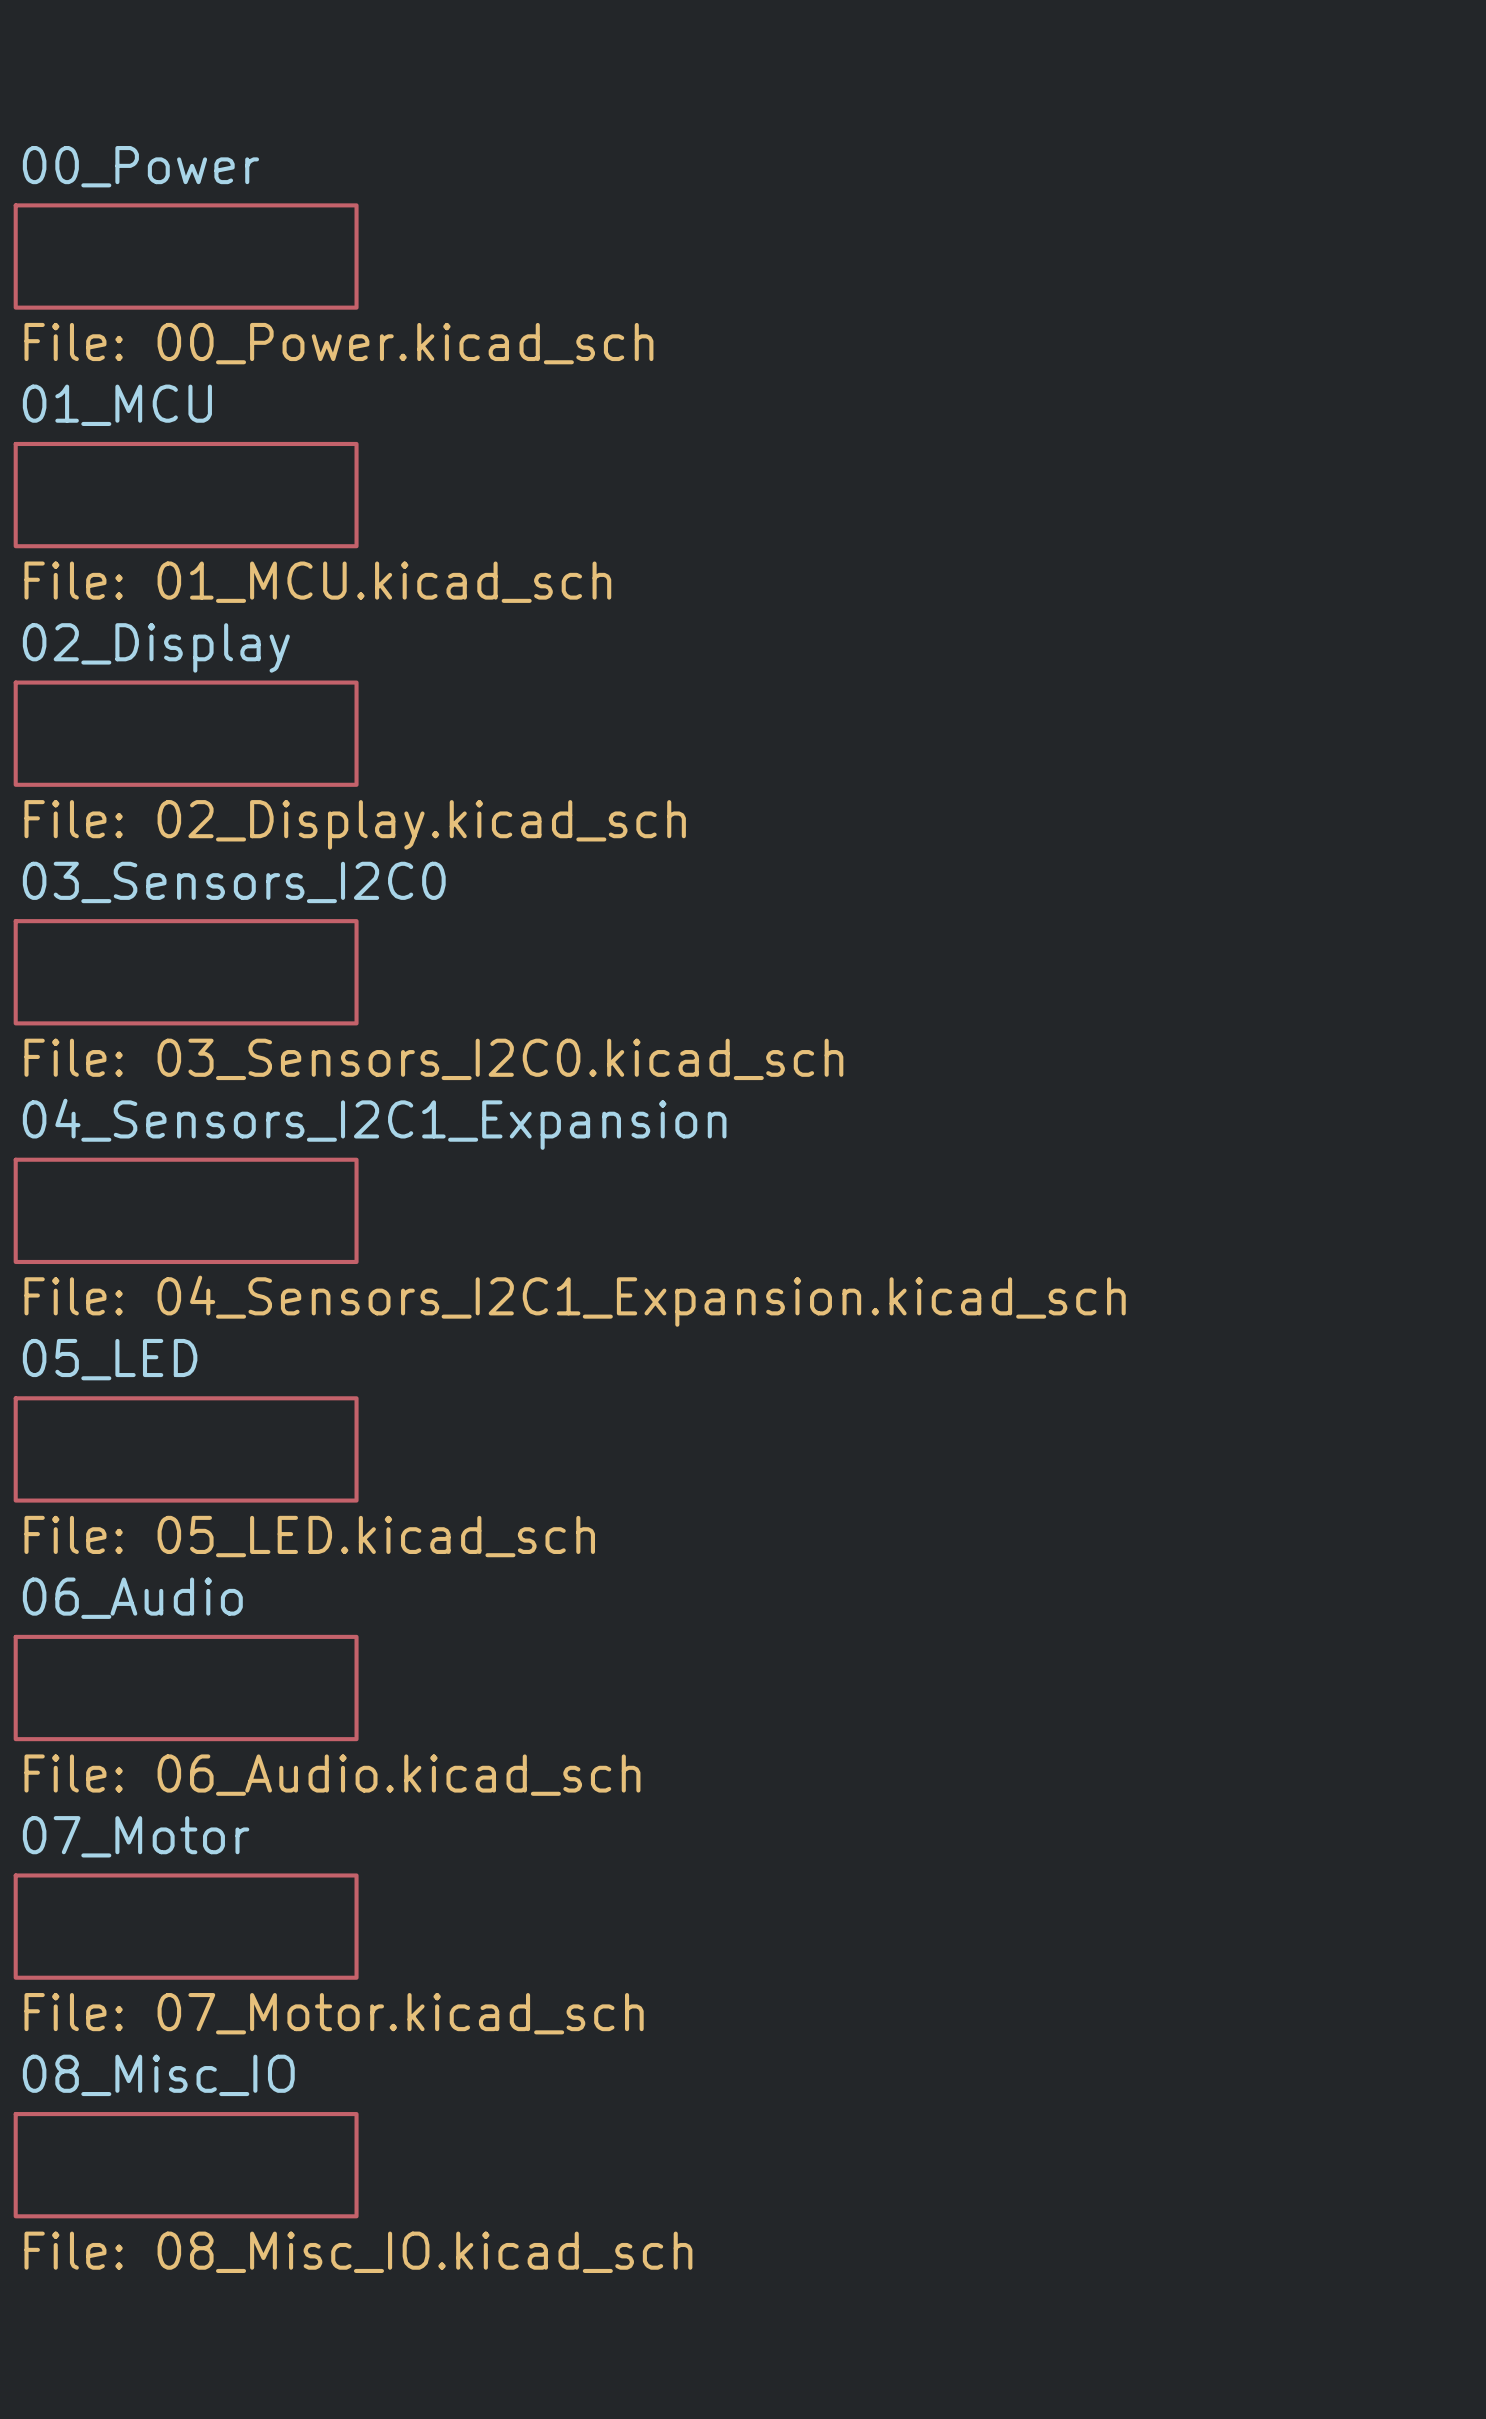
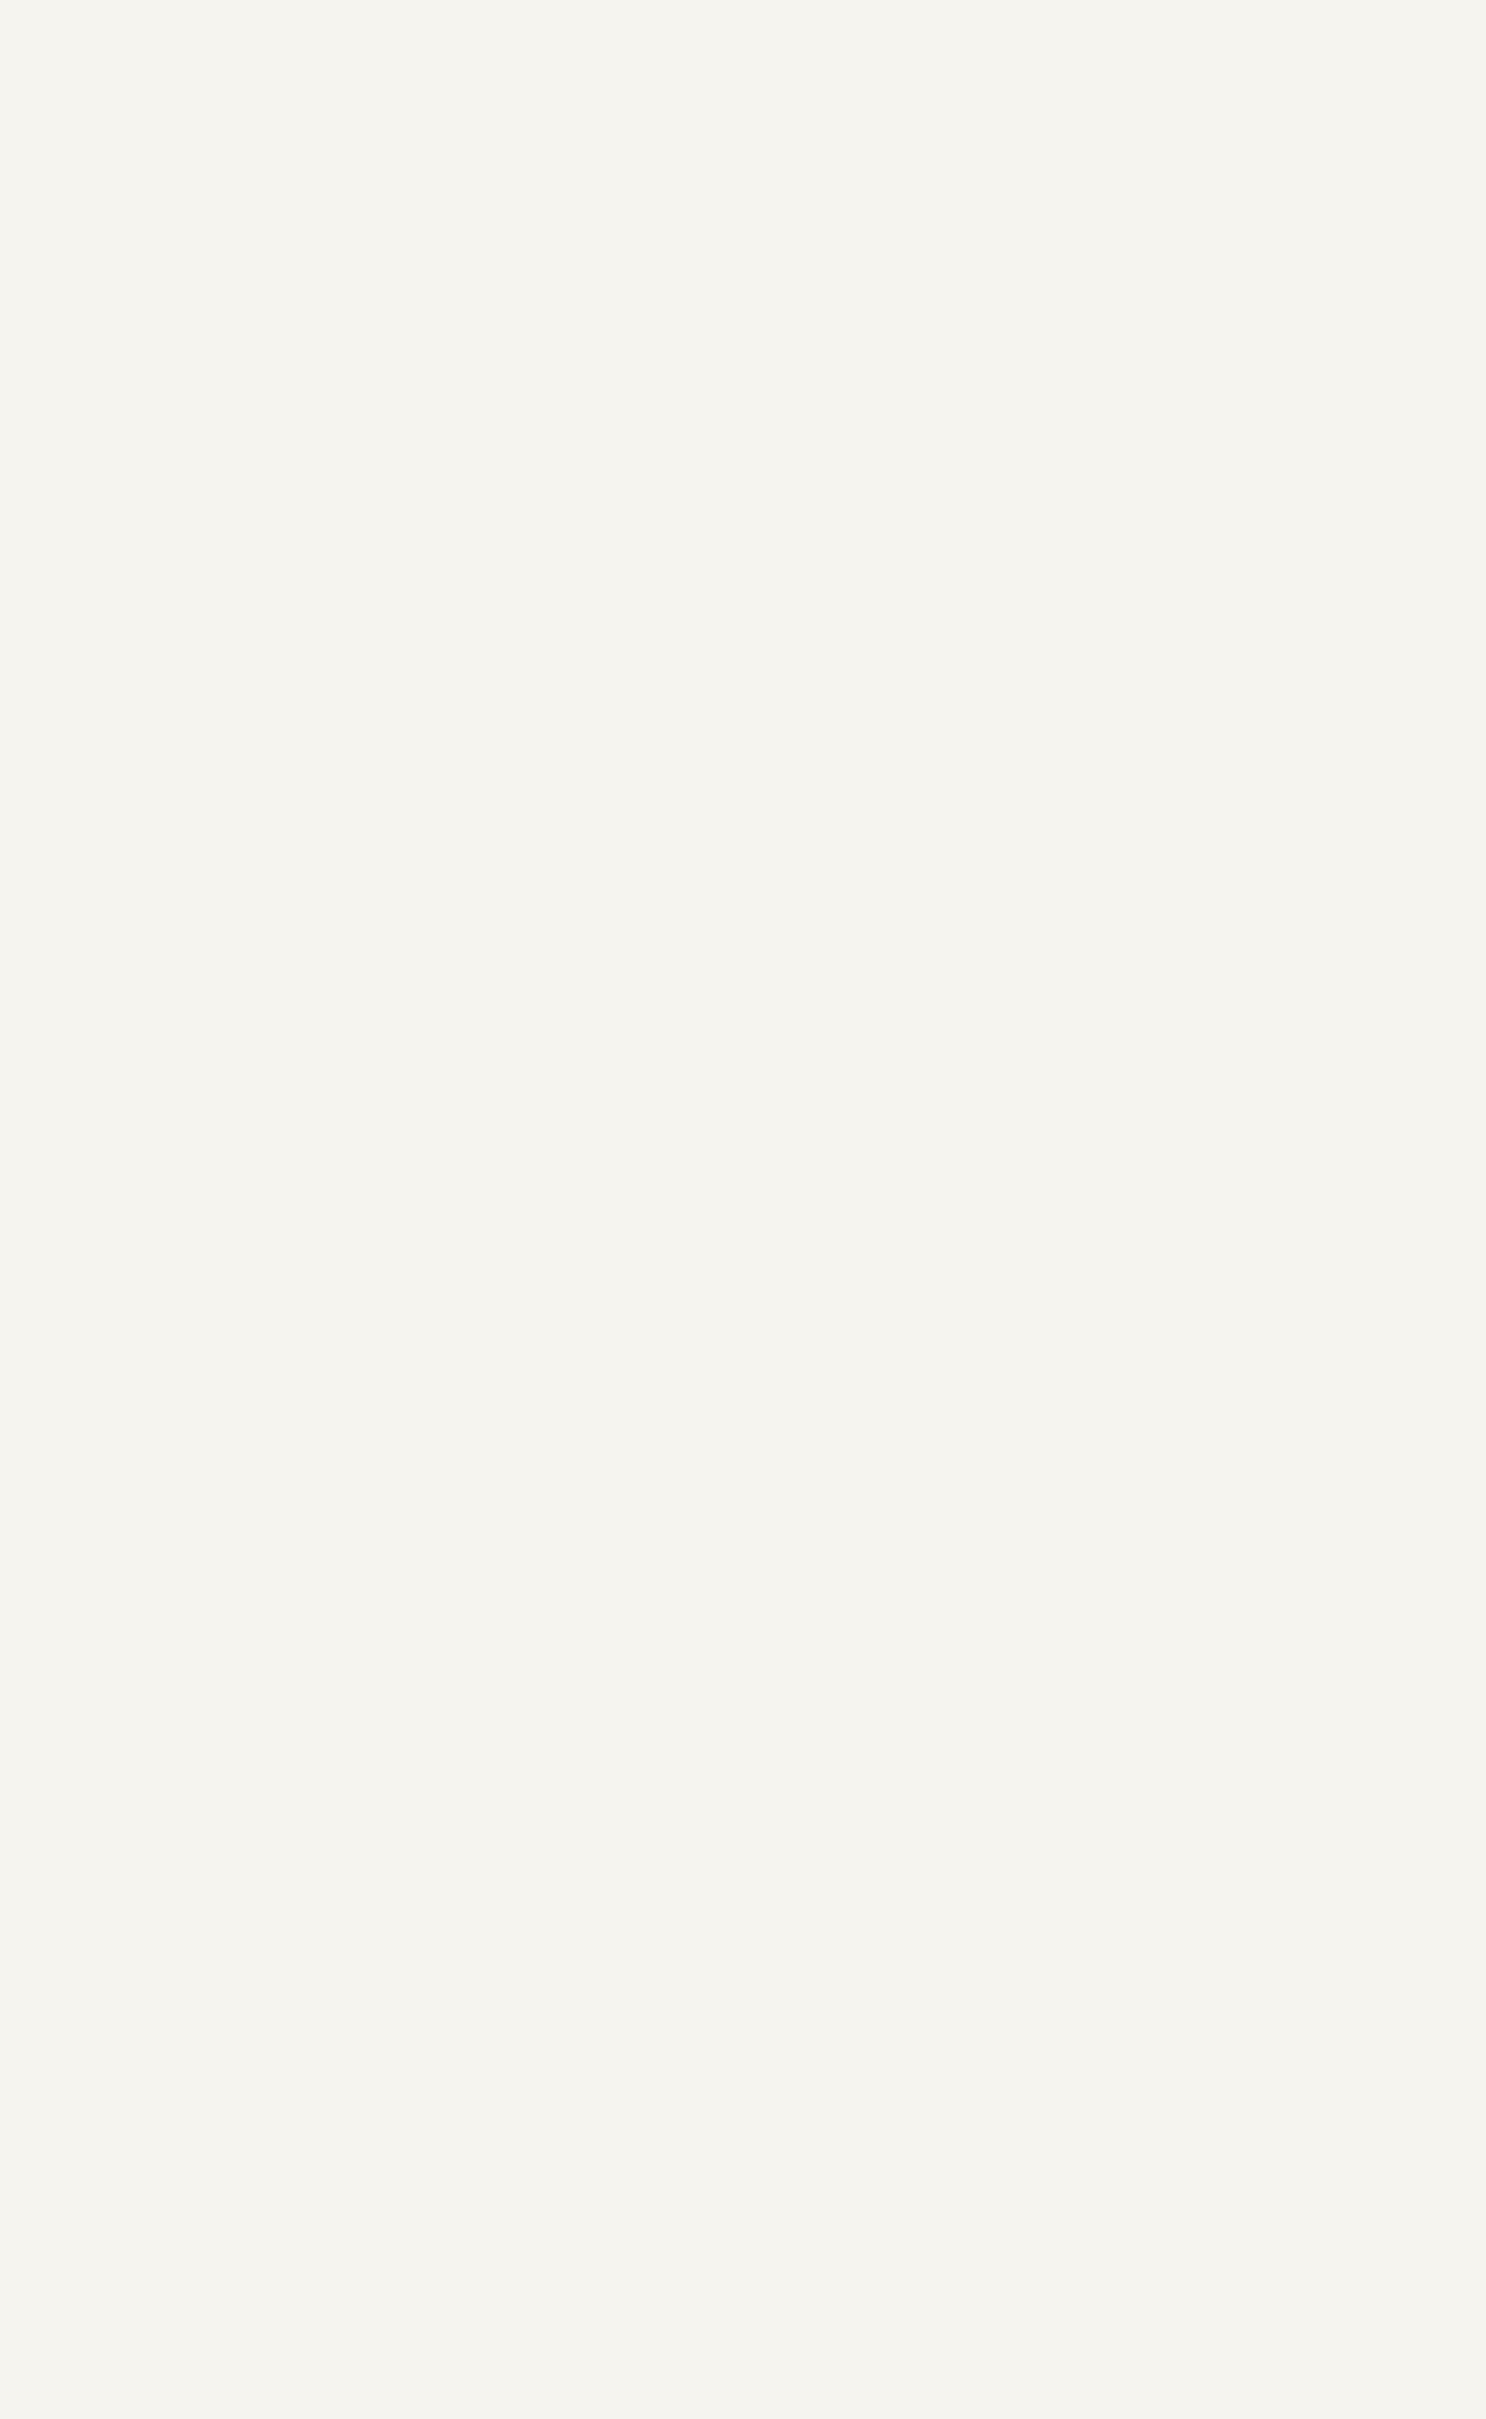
sheet 00_Power: File: 00_Power.kicad_sch (186, 256) -> none
sheet 01_MCU: File: 01_MCU.kicad_sch (186, 495) -> none
sheet 02_Display: File: 02_Display.kicad_sch (186, 733) -> none
sheet 03_Sensors_I2C0: File: 03_Sensors_I2C0.kicad_sch (186, 972) -> none
sheet 04_Sensors_I2C1_Expansion: File: 04_Sensors_I2C1_Expansion.kicad_sch (186, 1210) -> none
sheet 05_LED: File: 05_LED.kicad_sch (186, 1449) -> none
sheet 06_Audio: File: 06_Audio.kicad_sch (186, 1688) -> none
sheet 07_Motor: File: 07_Motor.kicad_sch (186, 1926) -> none
sheet 08_Misc_IO: File: 08_Misc_IO.kicad_sch (186, 2165) -> none

